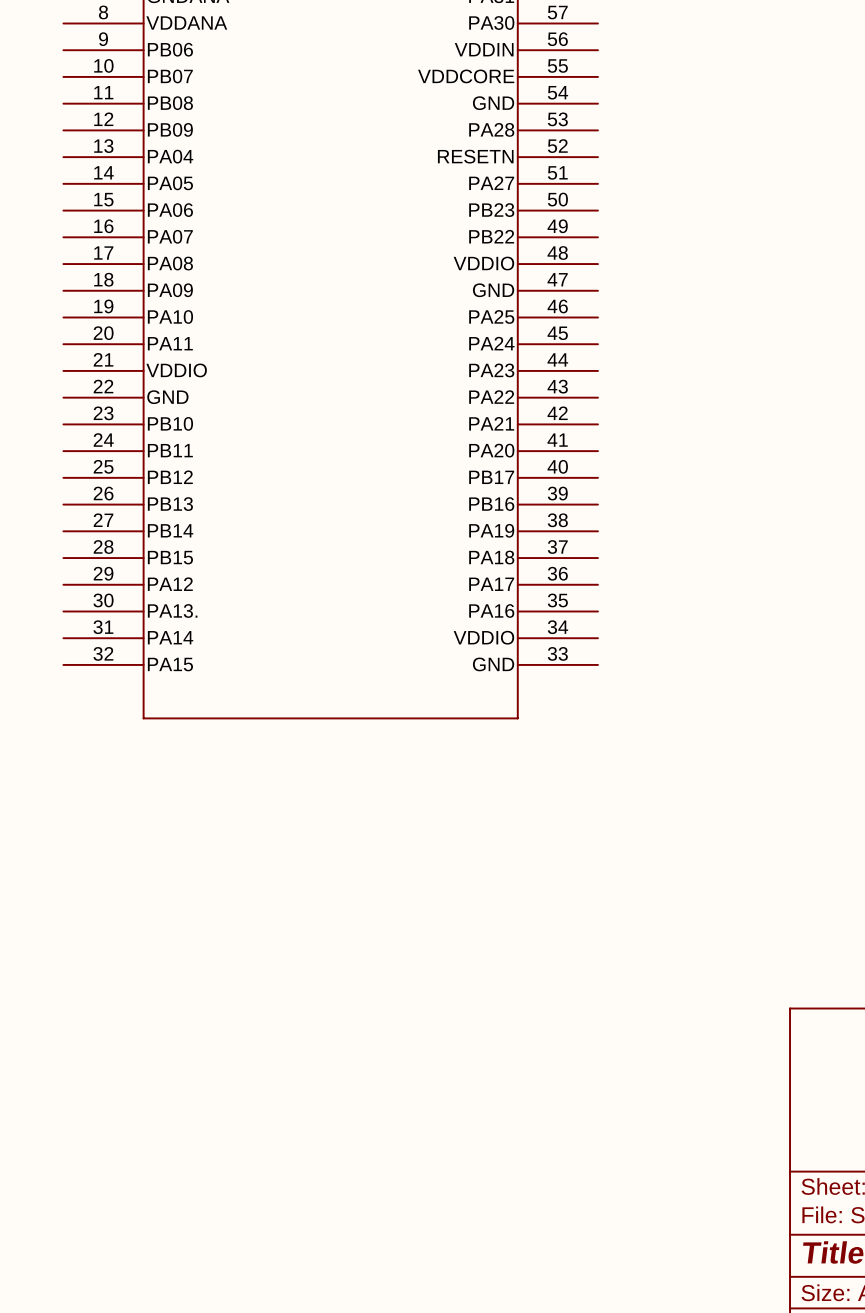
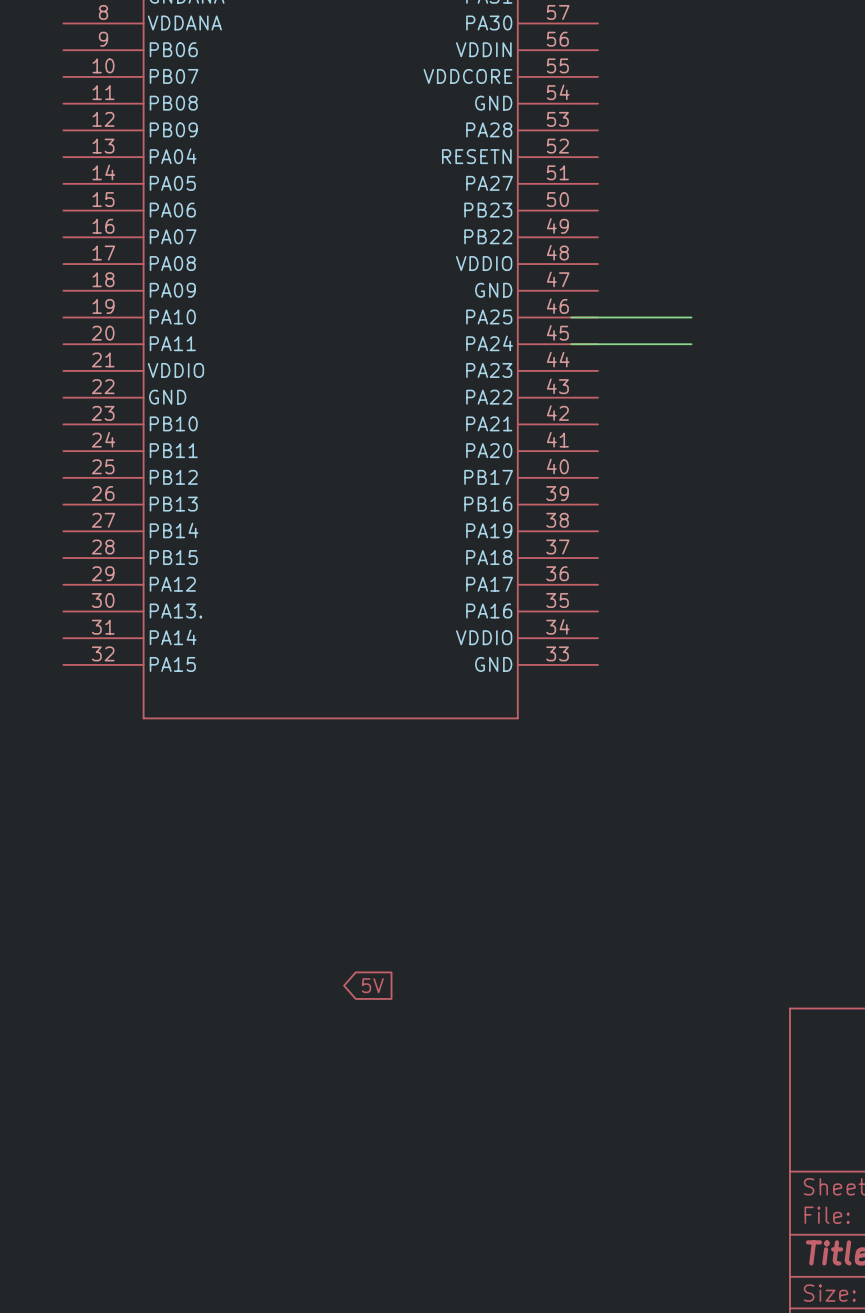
wire: none -> (571, 317) (691, 317)
wire: none -> (571, 344) (691, 344)
global label: none -> 5V (372, 985)

